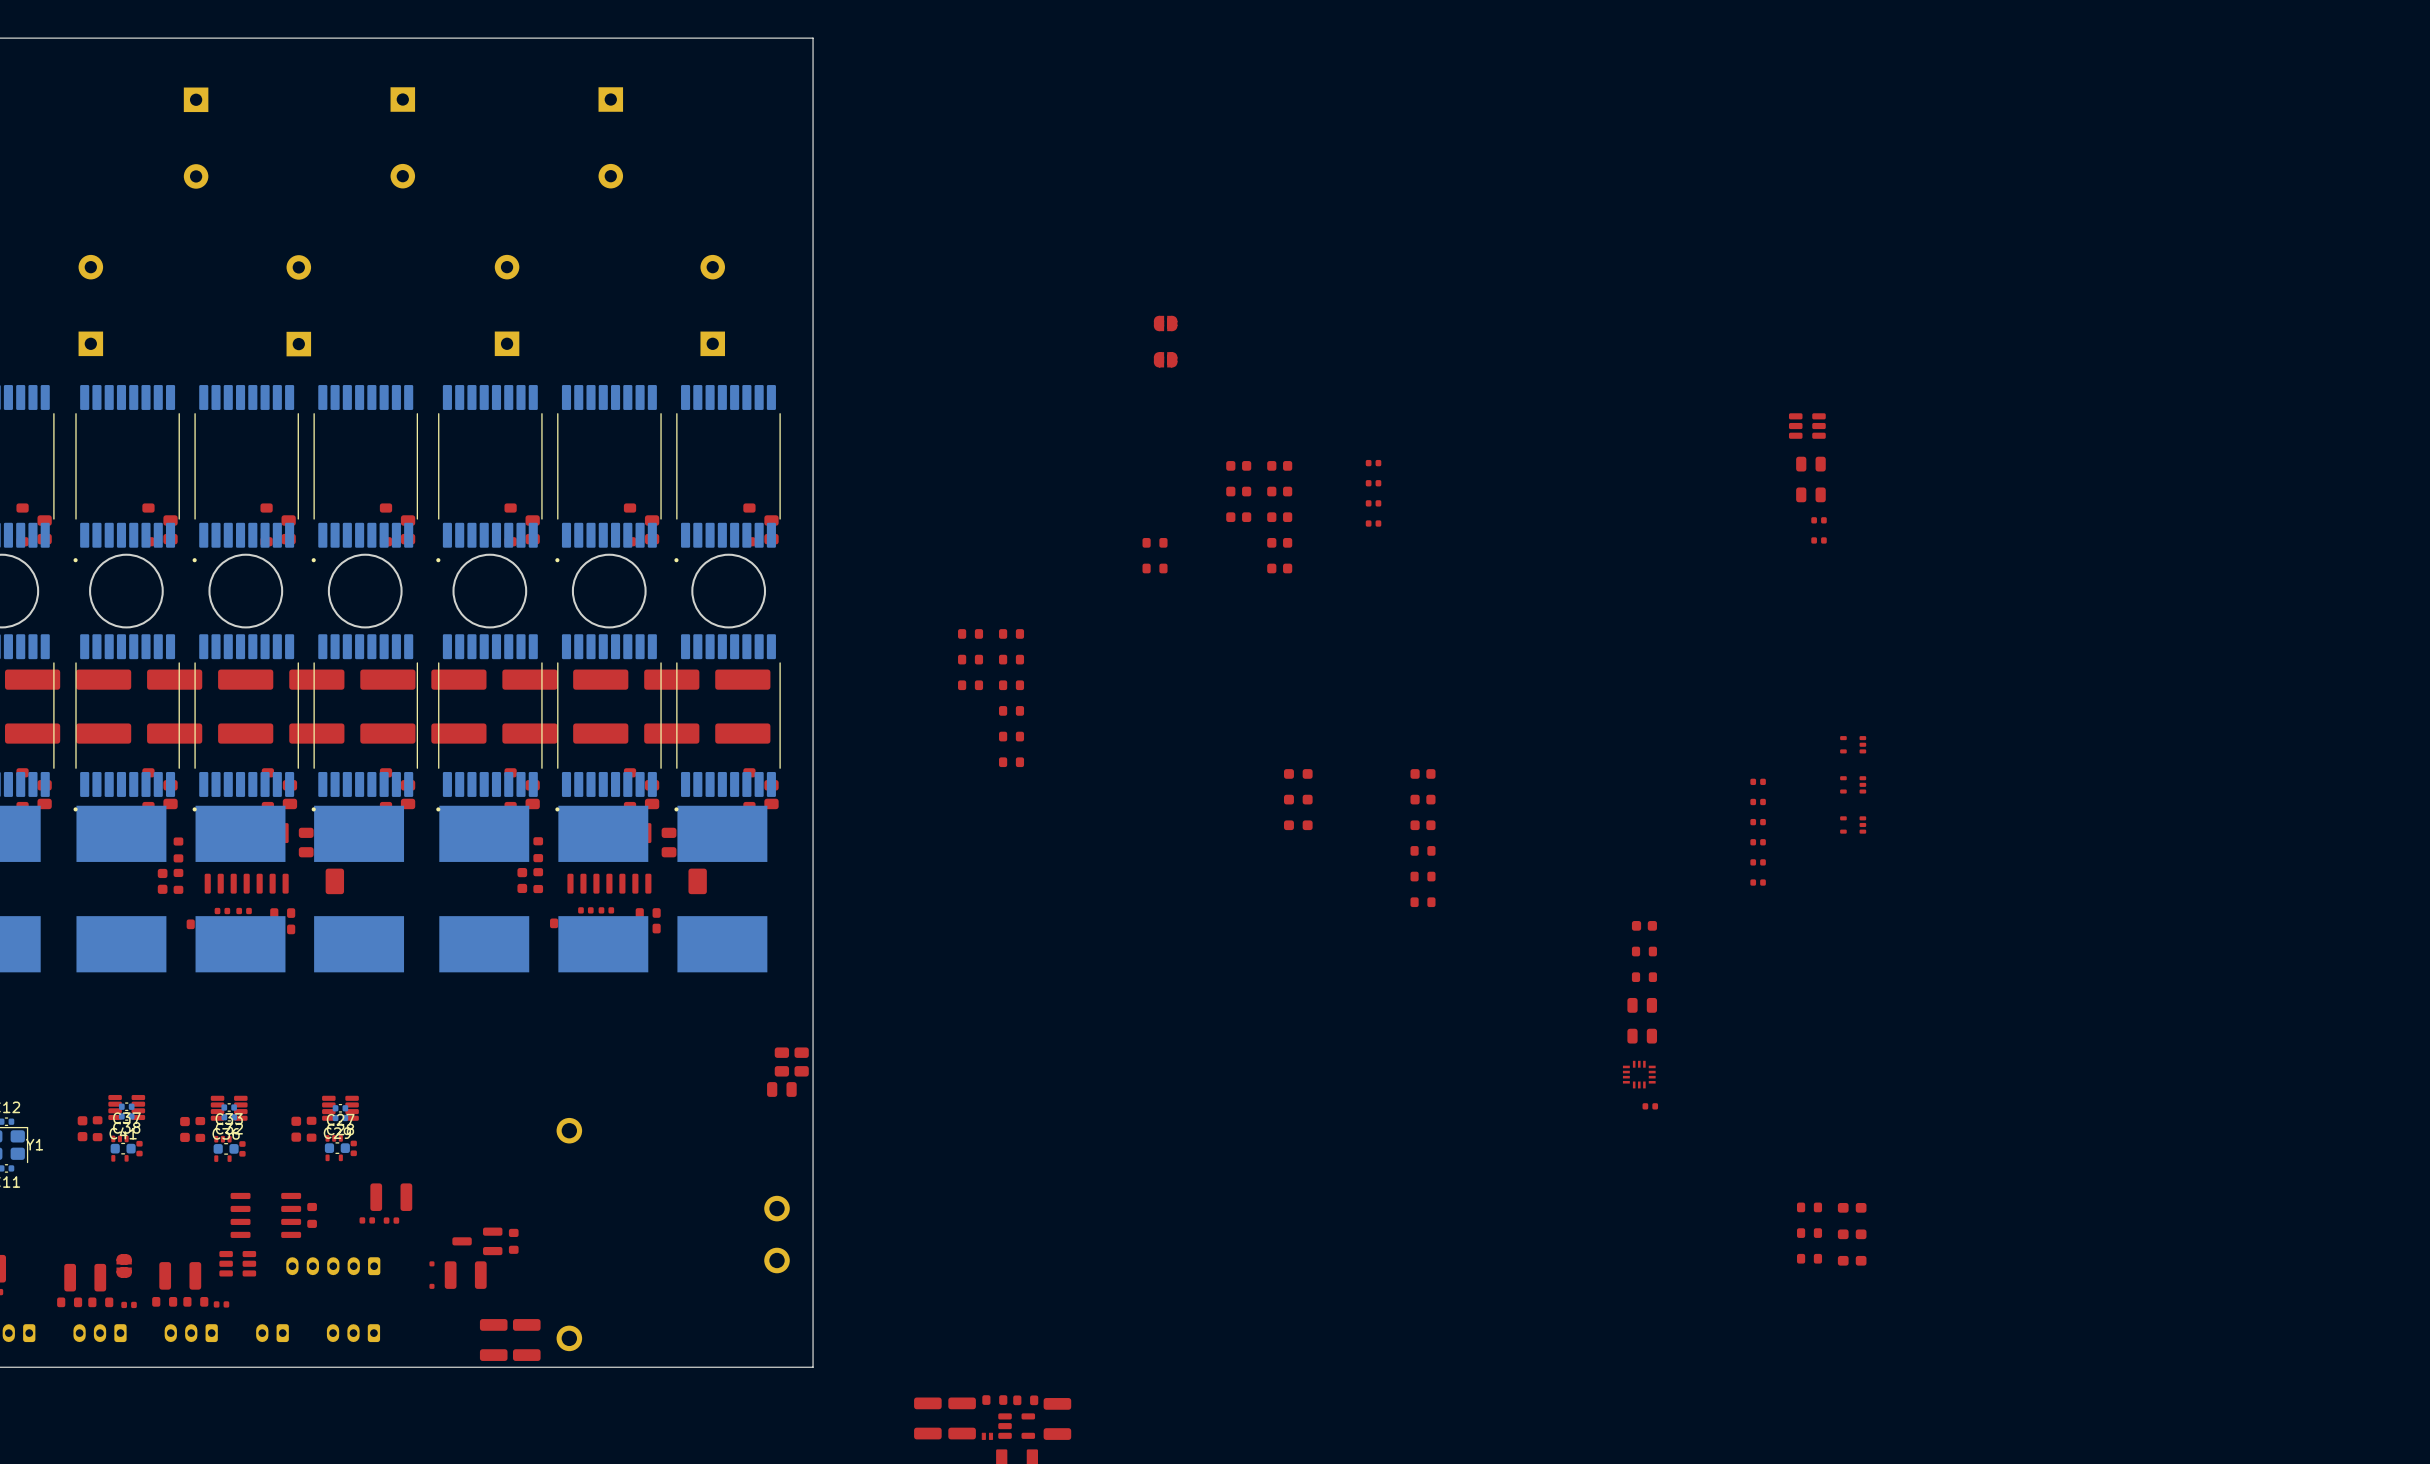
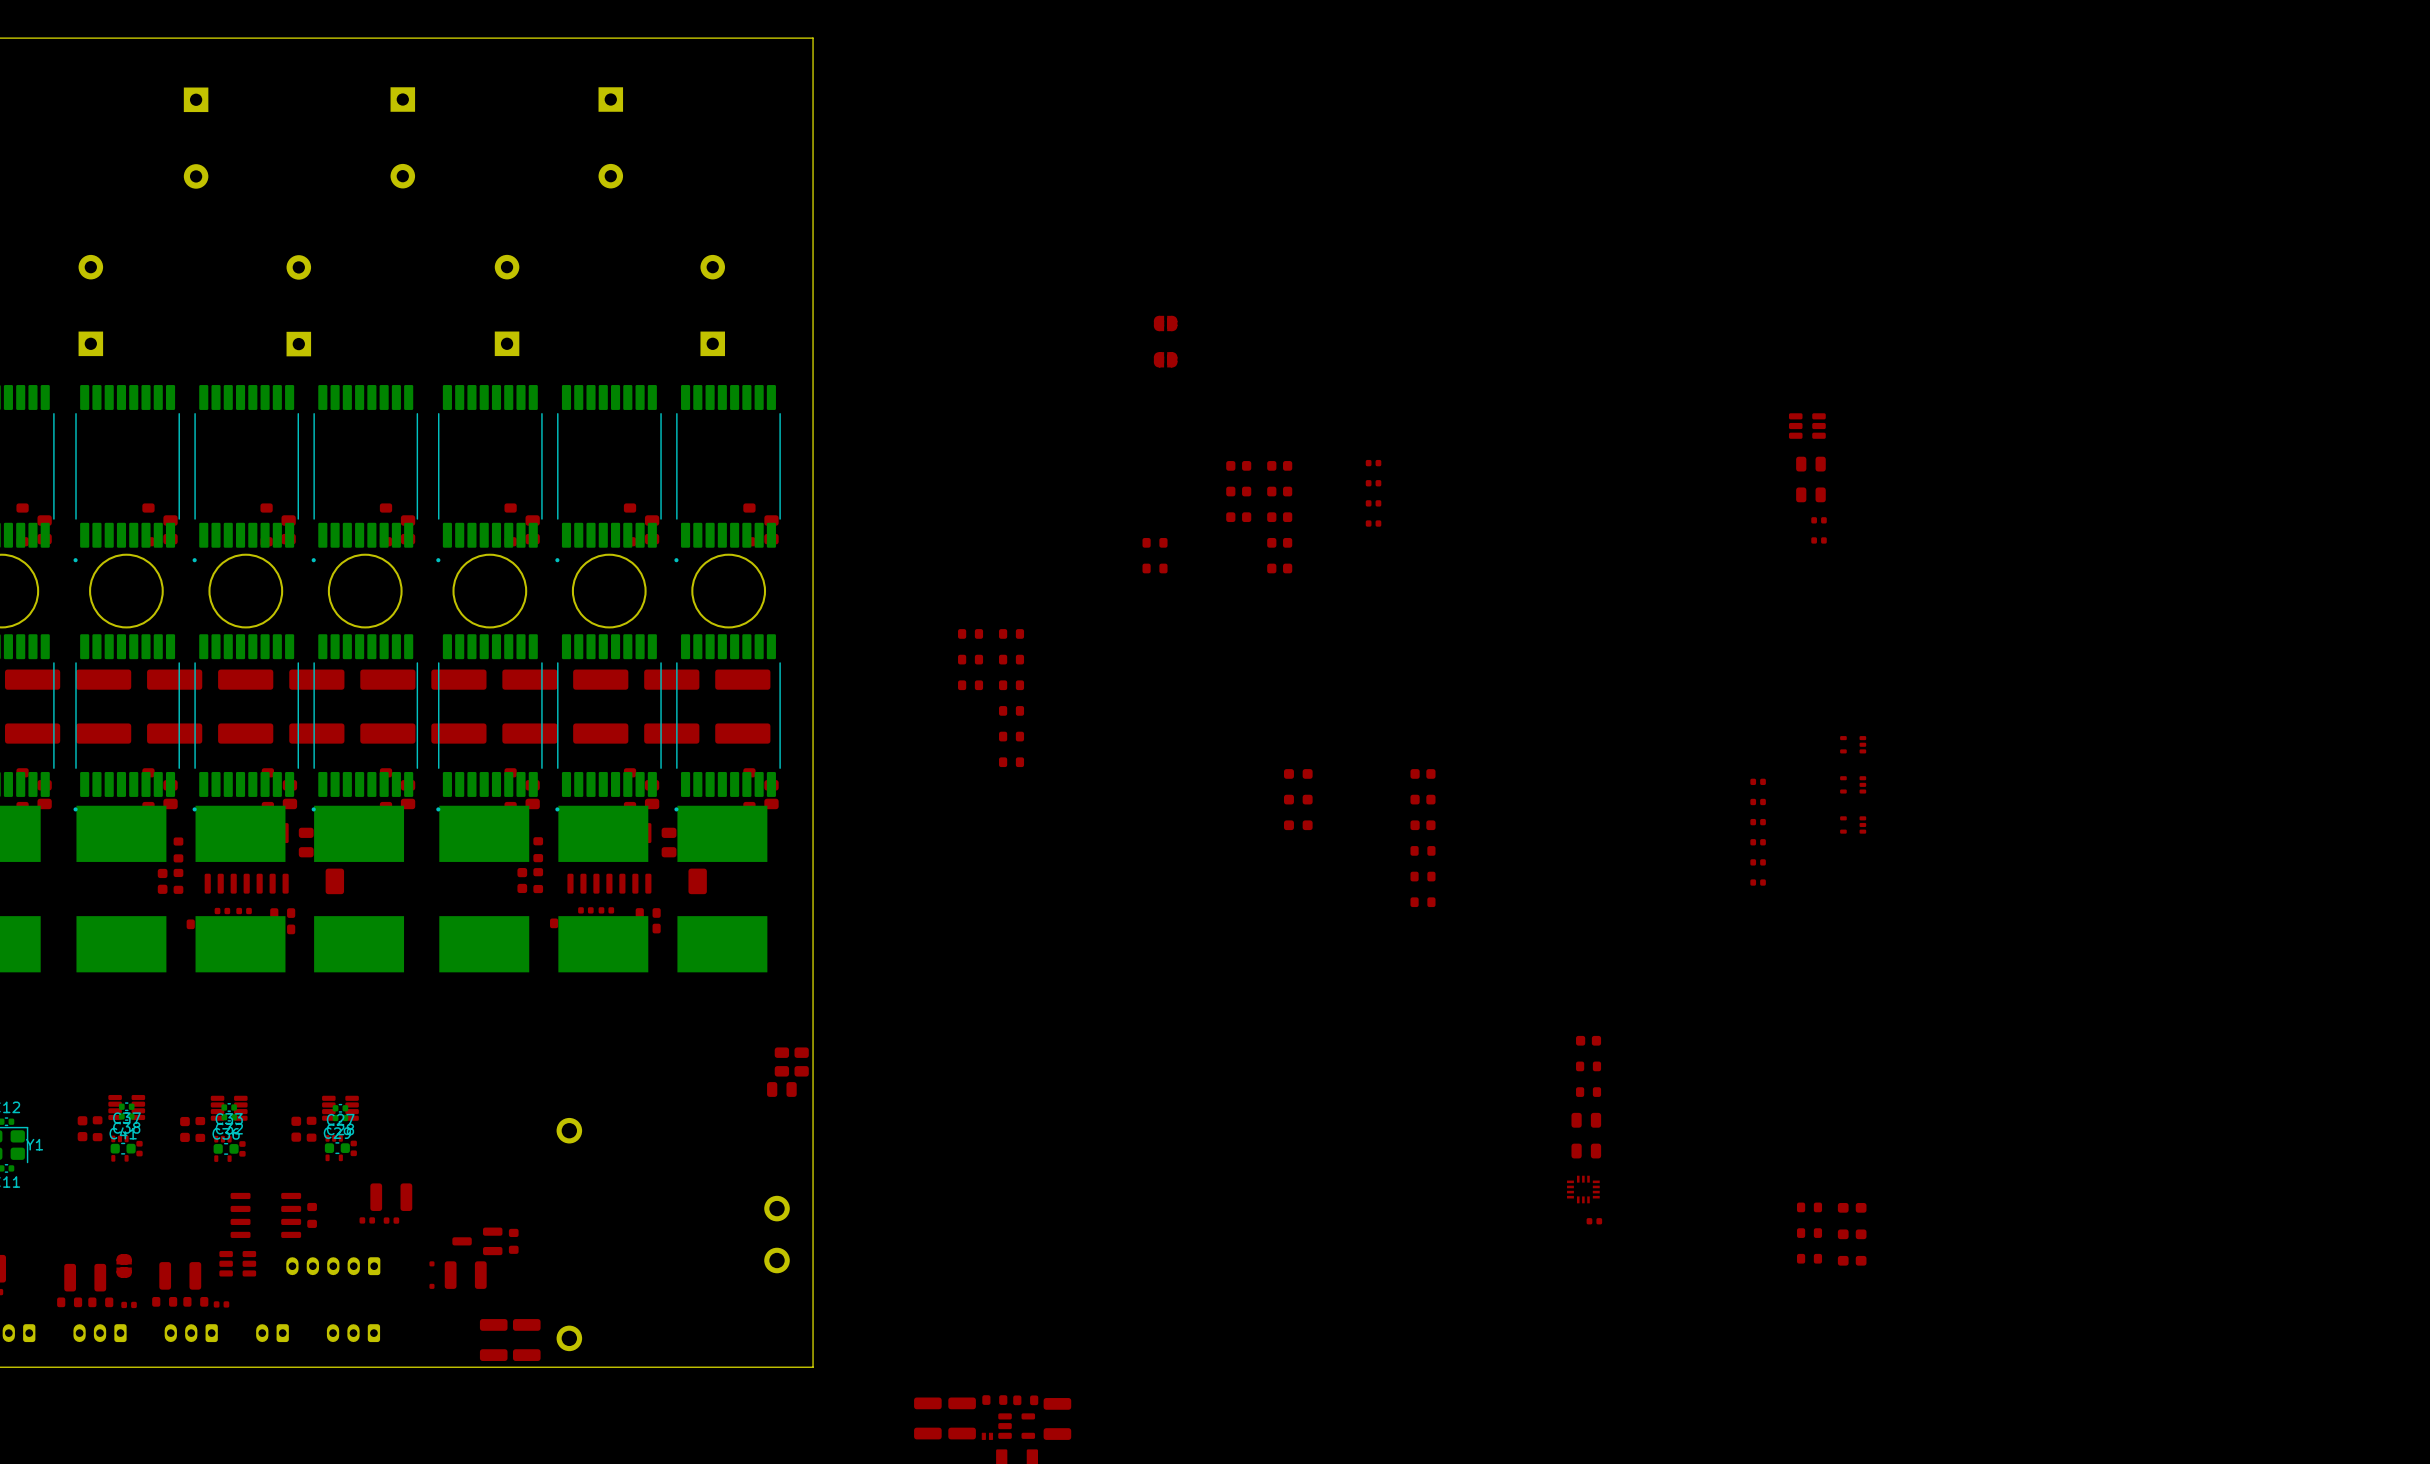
part position: (1644, 925) -> (1588, 1040)
part: (1644, 951) -> none
part: (1644, 977) -> none
part: (1642, 1005) -> none
part: (1642, 1036) -> none
part: none -> (1588, 1066)
part position: (1639, 1074) -> (1583, 1189)
part: none -> (1588, 1092)
part position: (1650, 1106) -> (1594, 1221)
part: none -> (1586, 1120)
part: none -> (1586, 1151)

